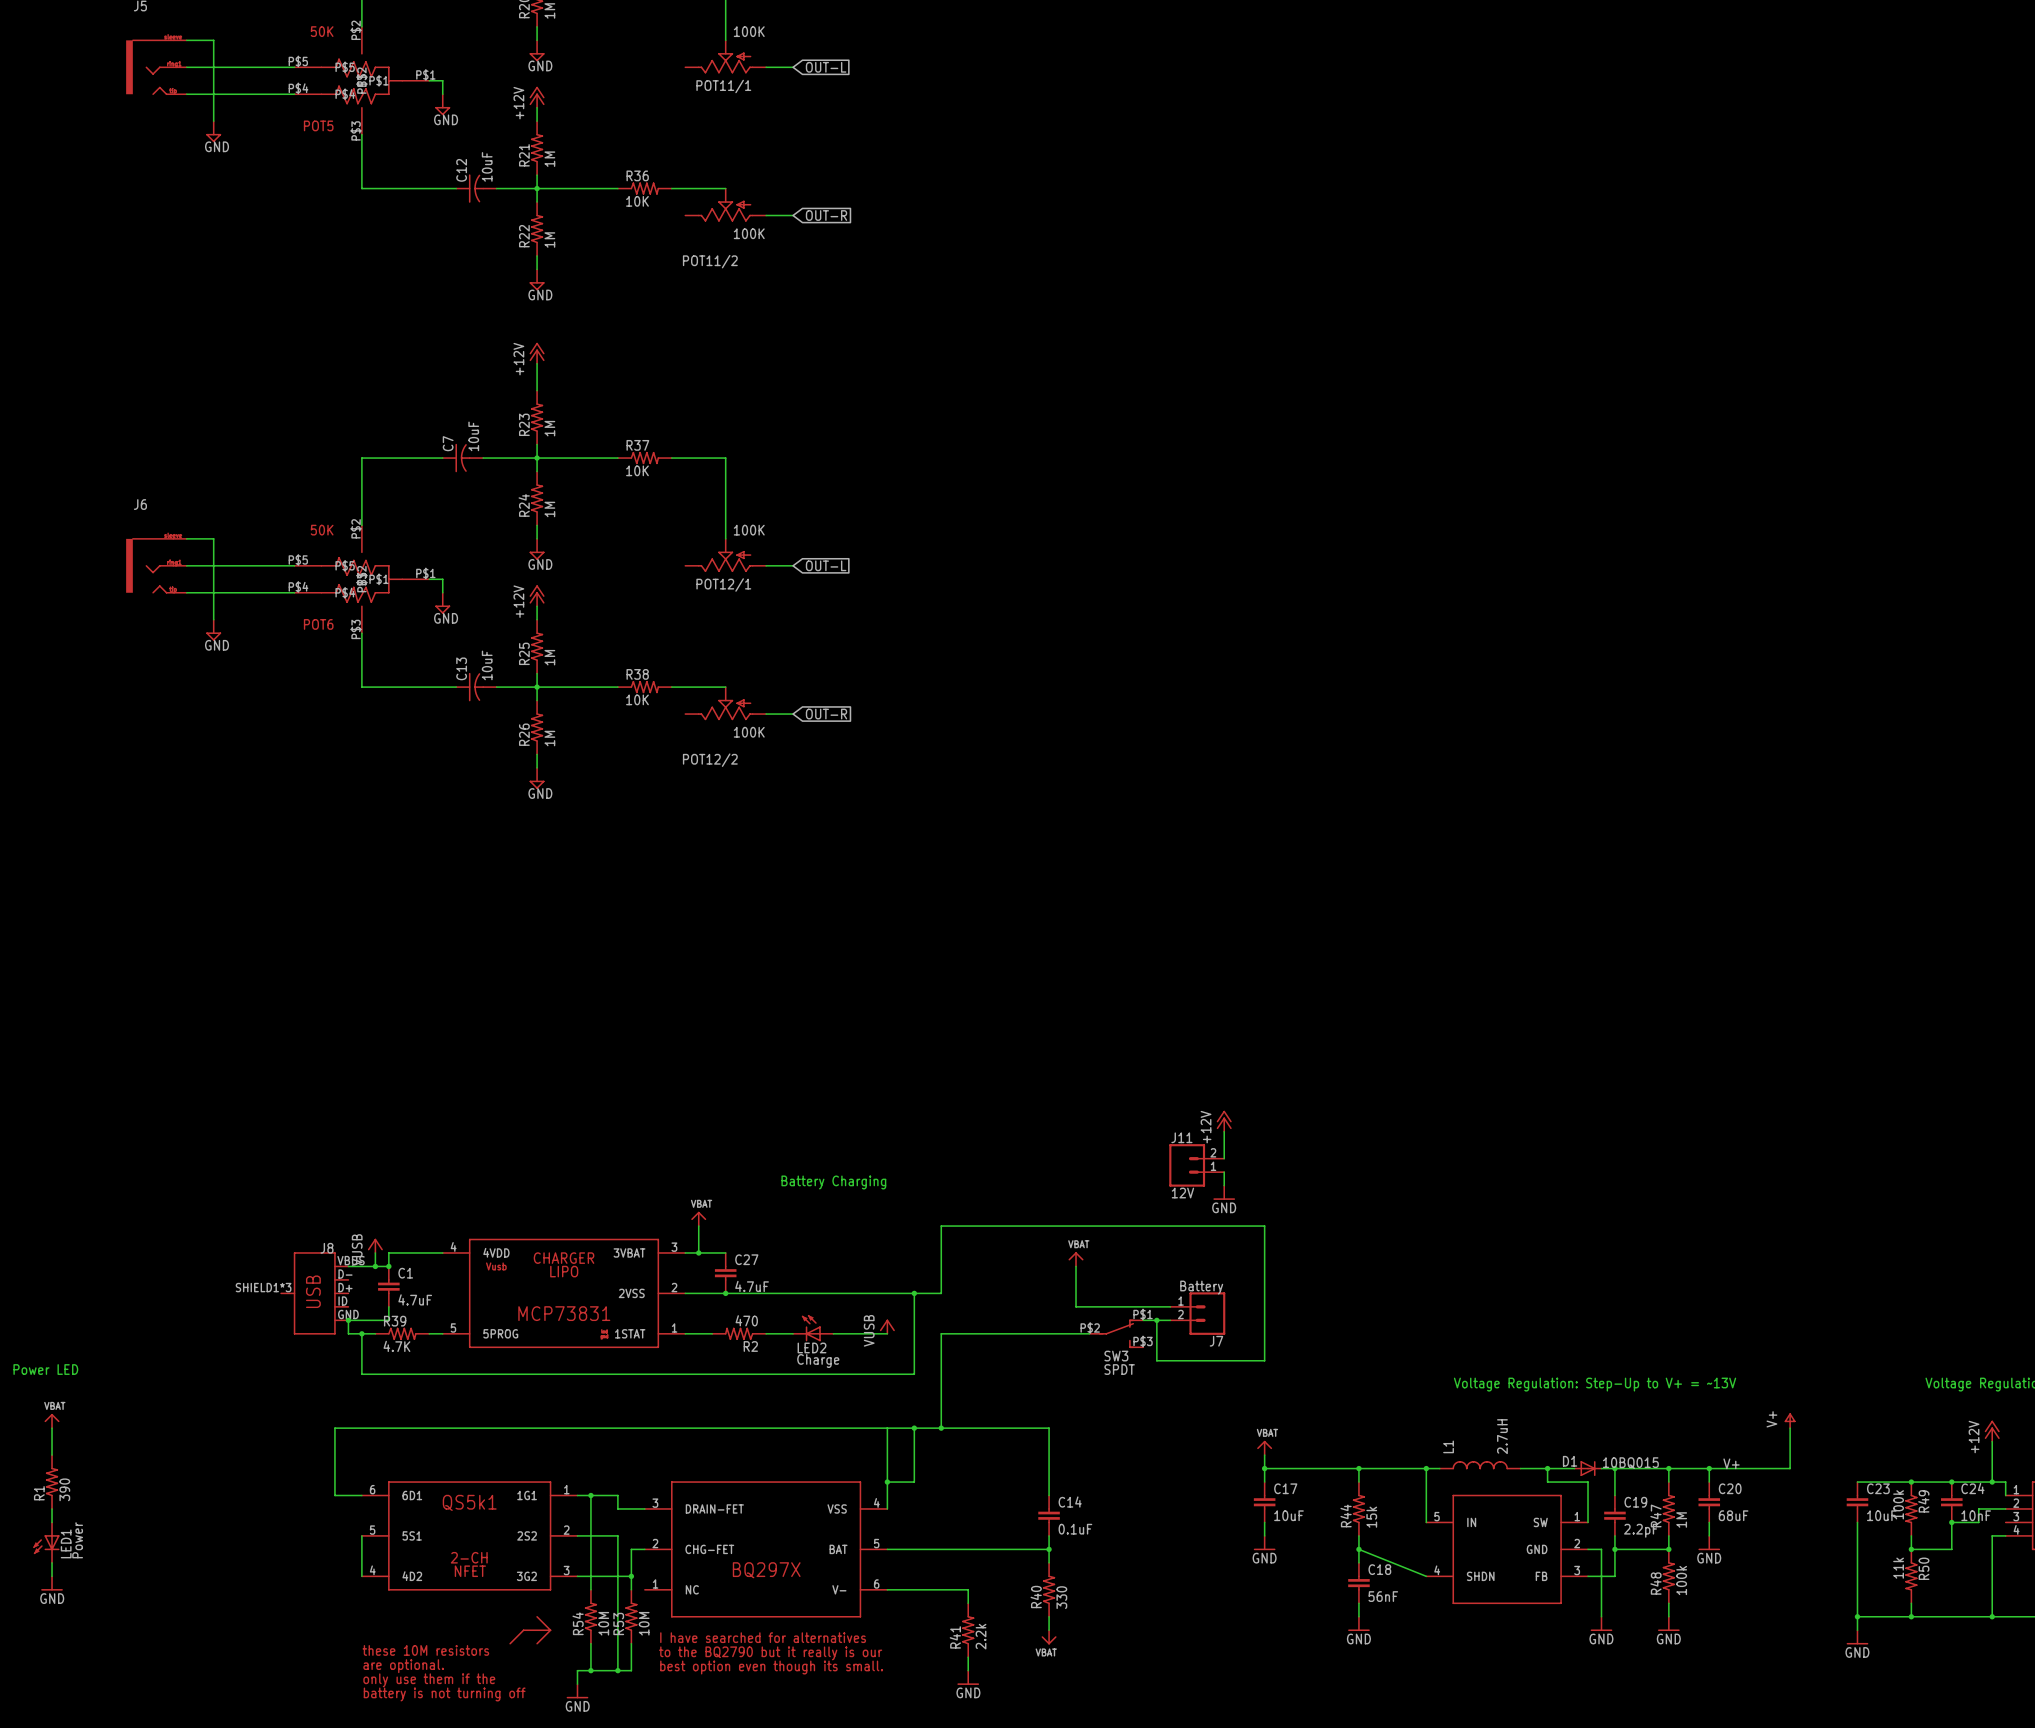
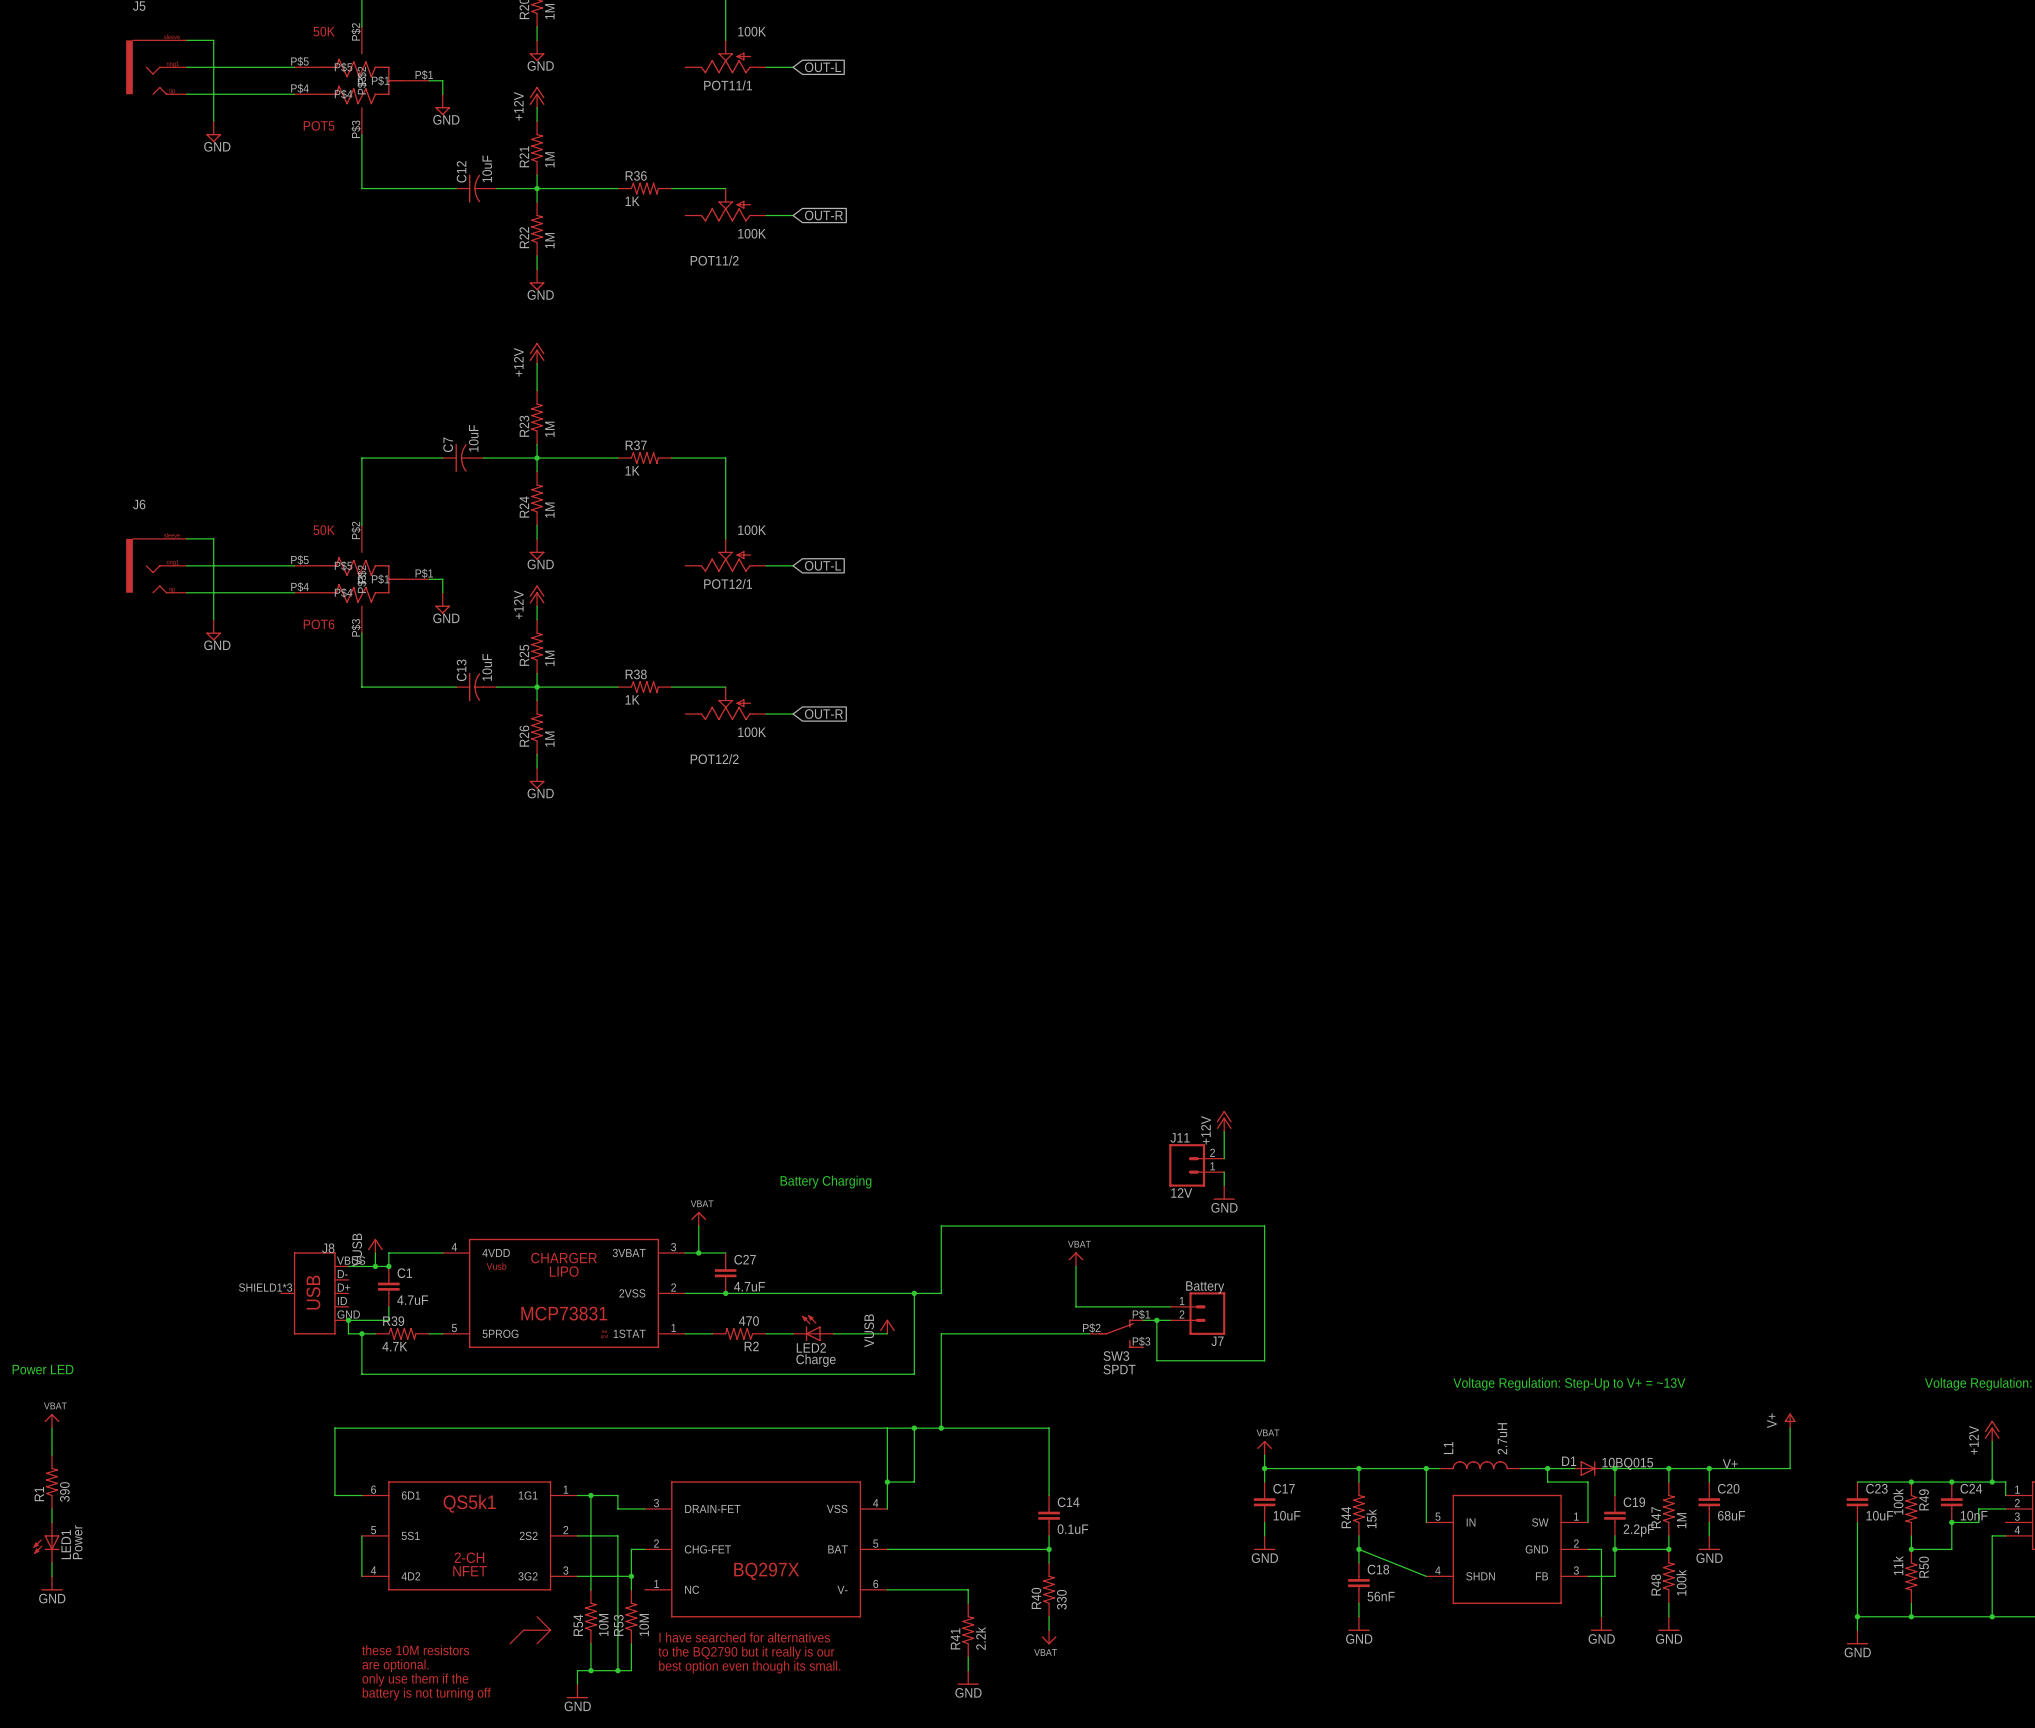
R36 value: 10K (637, 201) -> 1K (632, 201)
R37 value: 10K (637, 470) -> 1K (632, 470)
R38 value: 10K (637, 699) -> 1K (632, 699)

